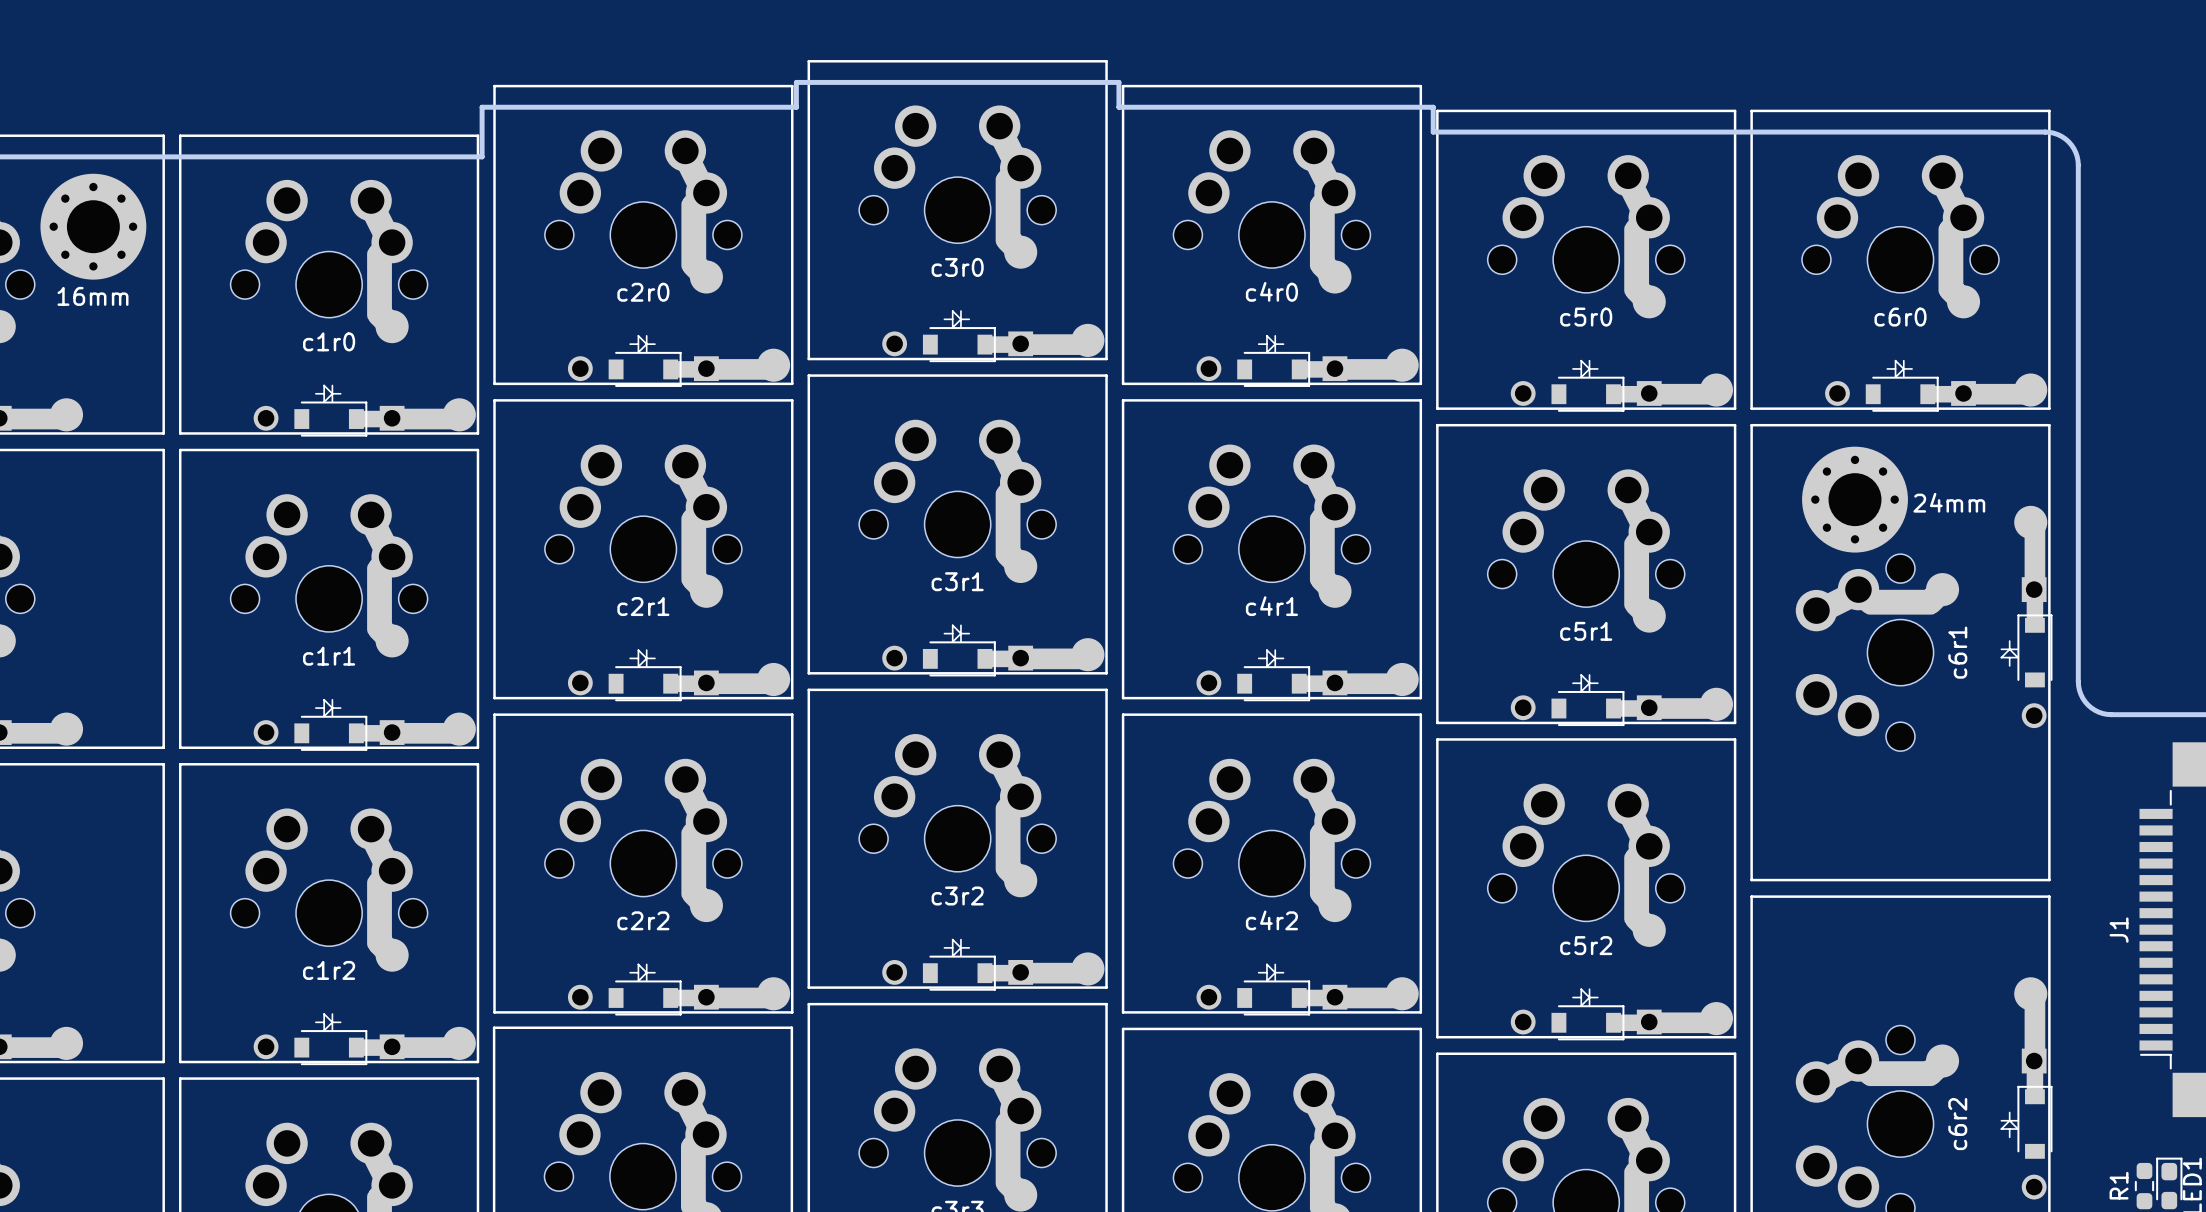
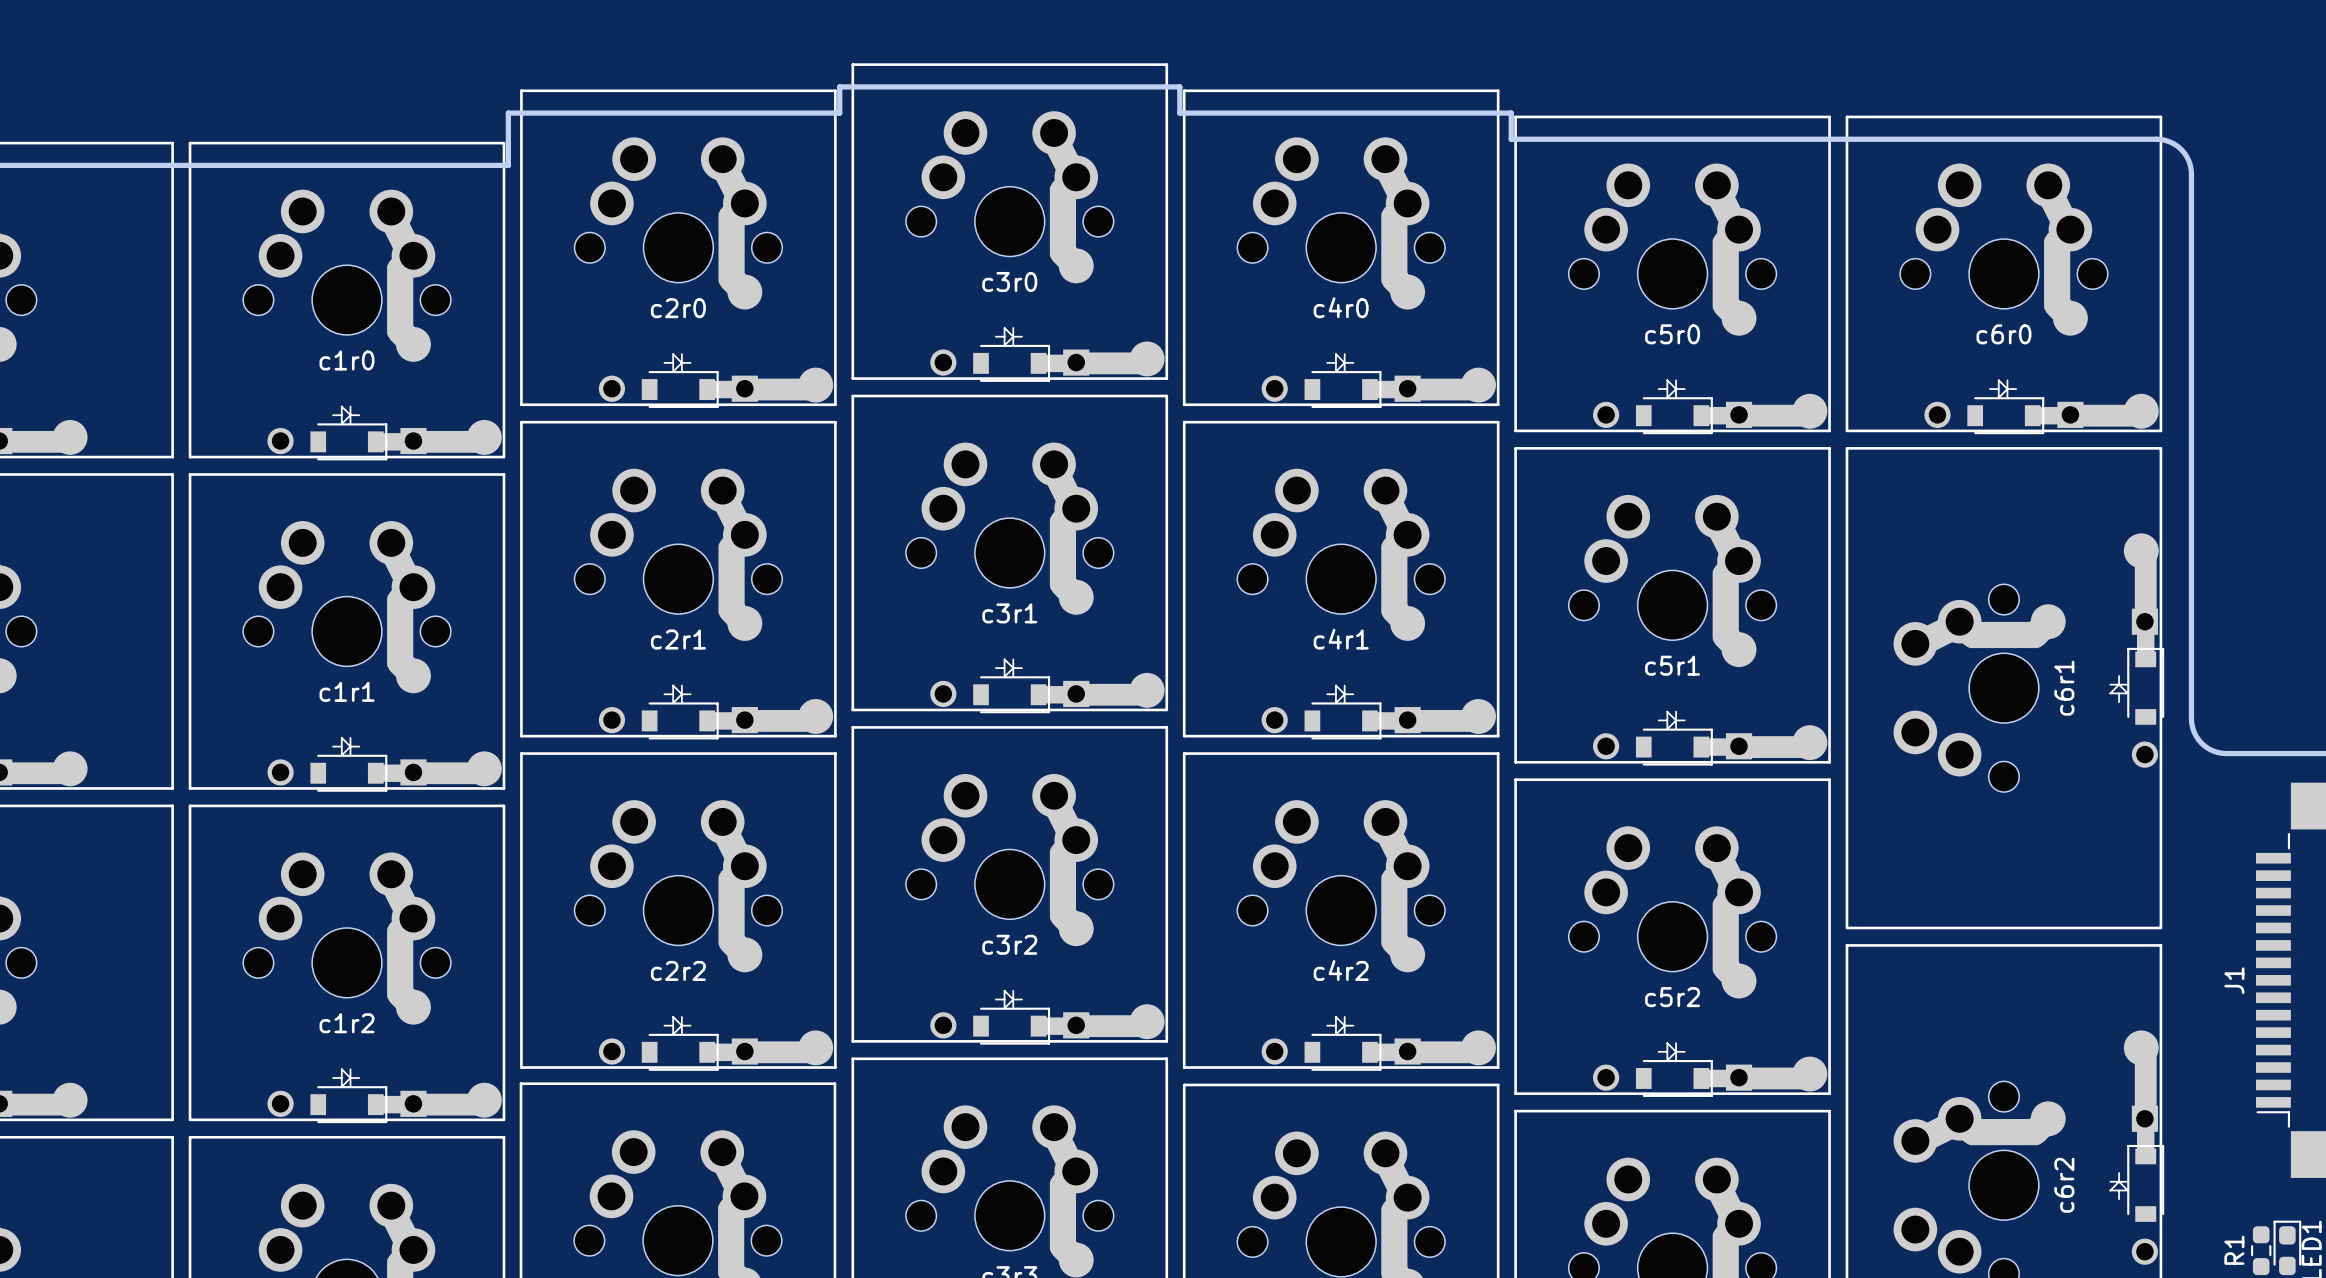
16mm: (93, 226) -> none
24mm: (1855, 499) -> none

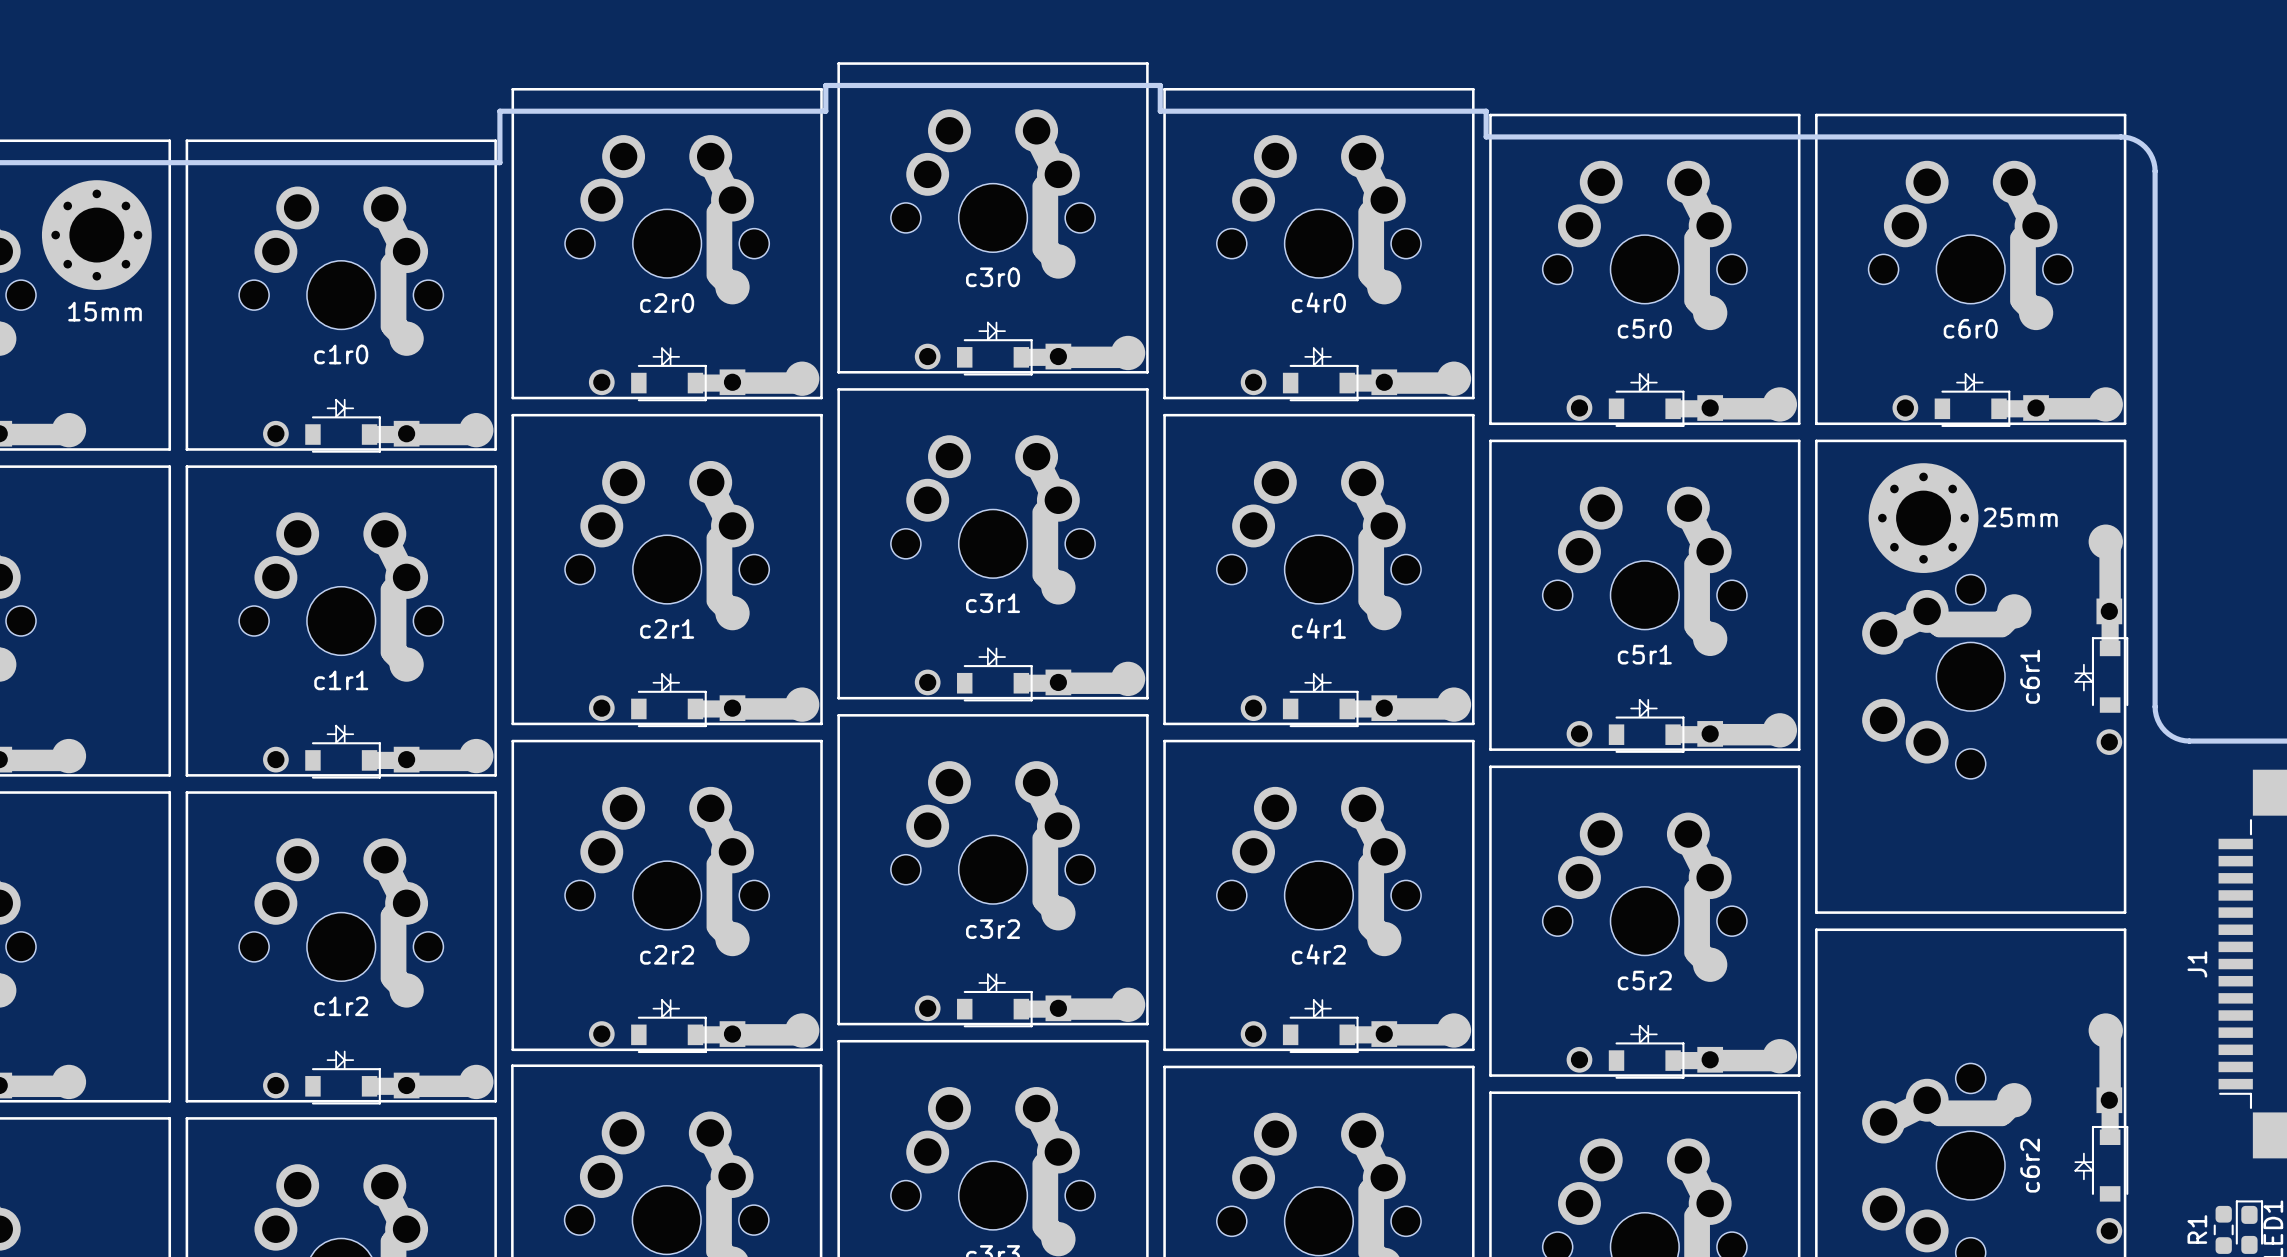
15mm: none -> (96, 235)
25mm: none -> (1923, 518)

